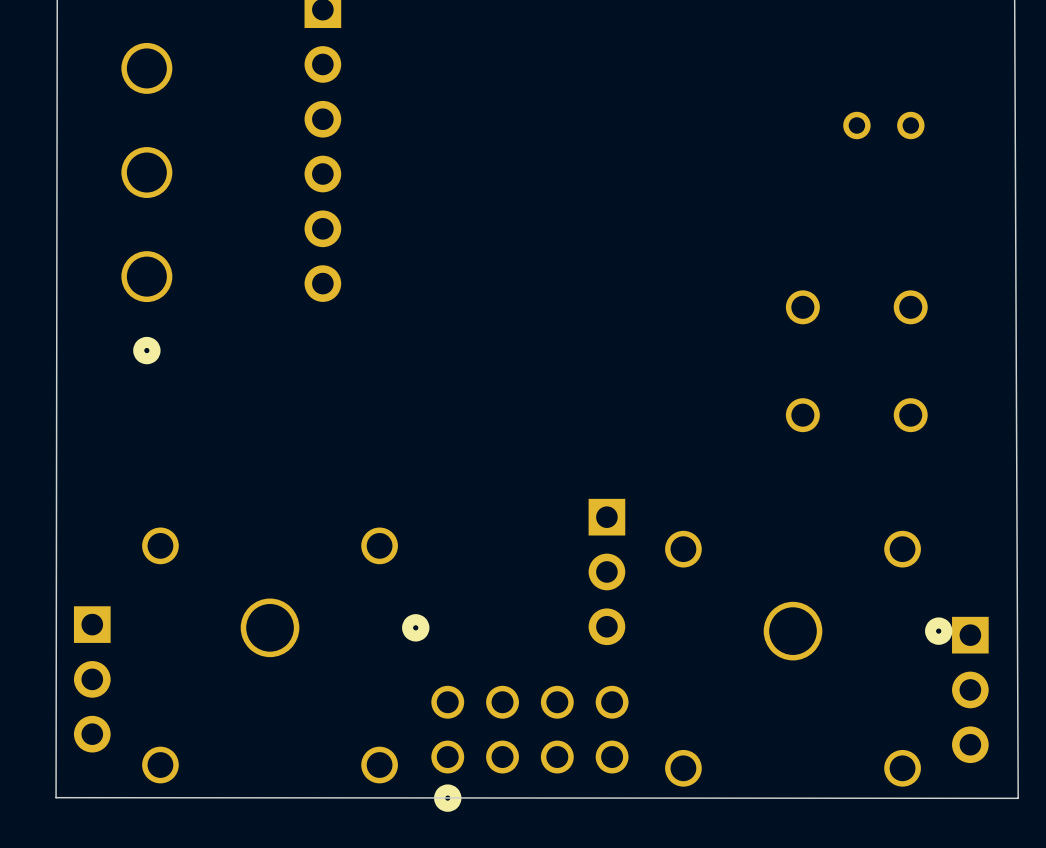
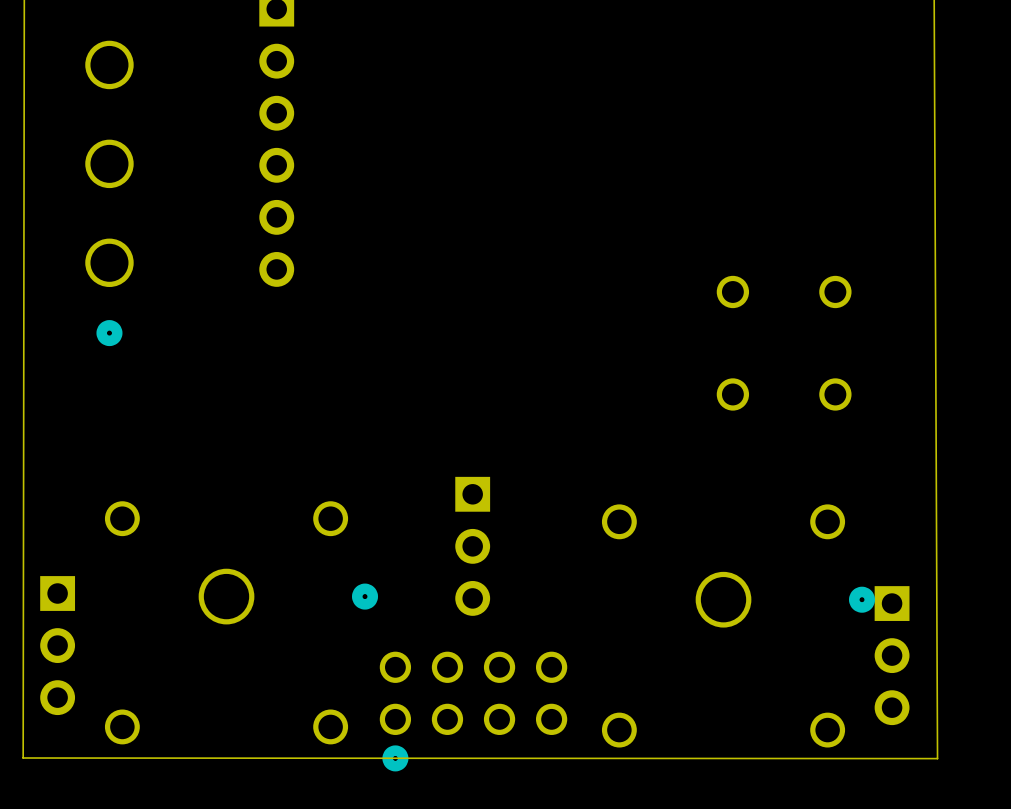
part: (883, 125) -> none
part position: (606, 571) -> (472, 546)

